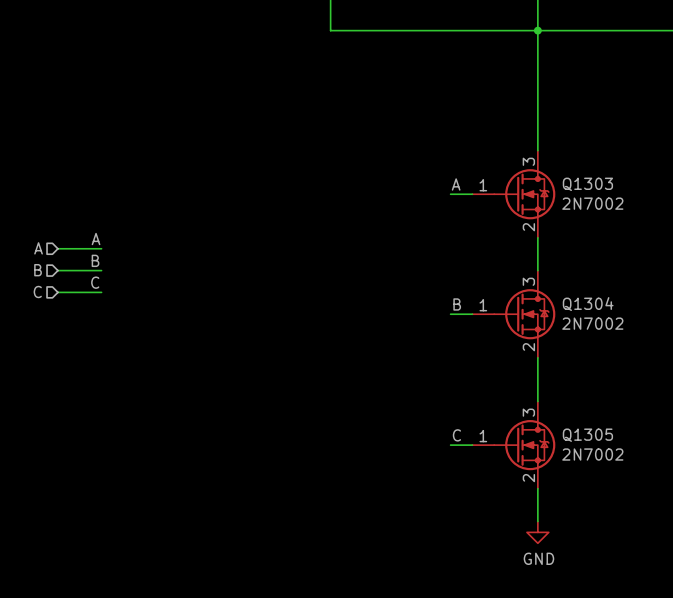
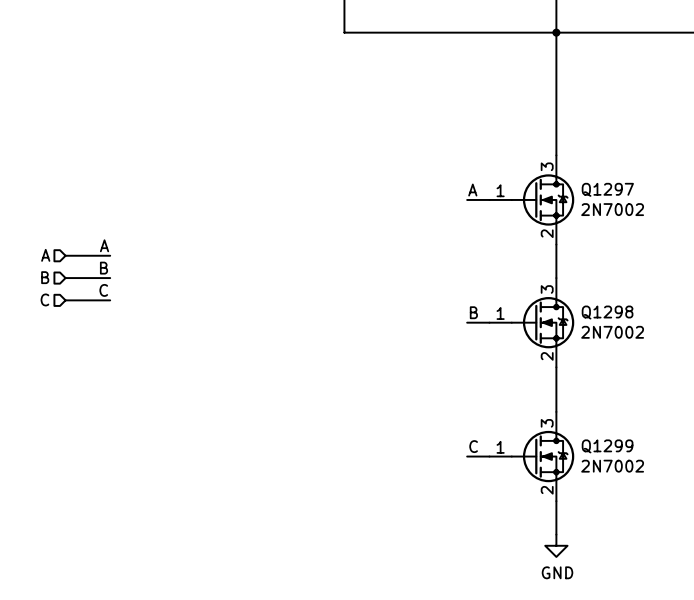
Q1303 name: Q1303 (587, 184) -> Q1297 (607, 189)
Q1304 name: Q1304 (588, 304) -> Q1298 (607, 312)
Q1305 name: Q1305 (587, 435) -> Q1299 (607, 446)

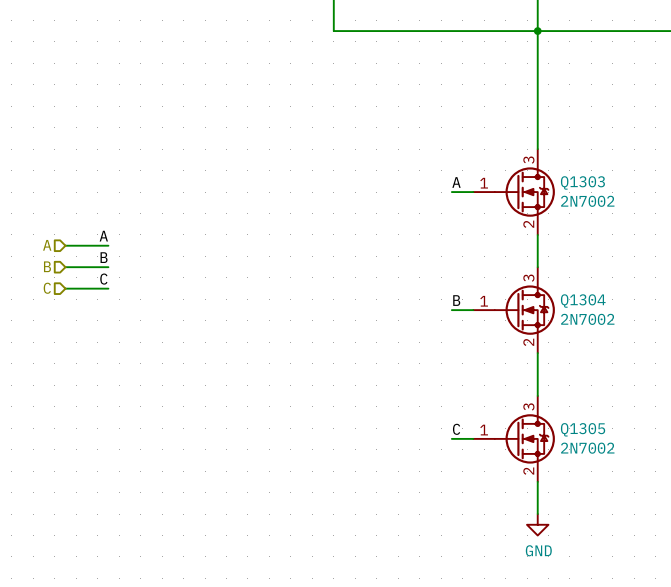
Q1297 name: Q1297 (607, 189) -> Q1303 (582, 182)
Q1298 name: Q1298 (607, 312) -> Q1304 (583, 301)
Q1299 name: Q1299 (607, 446) -> Q1305 (583, 429)

